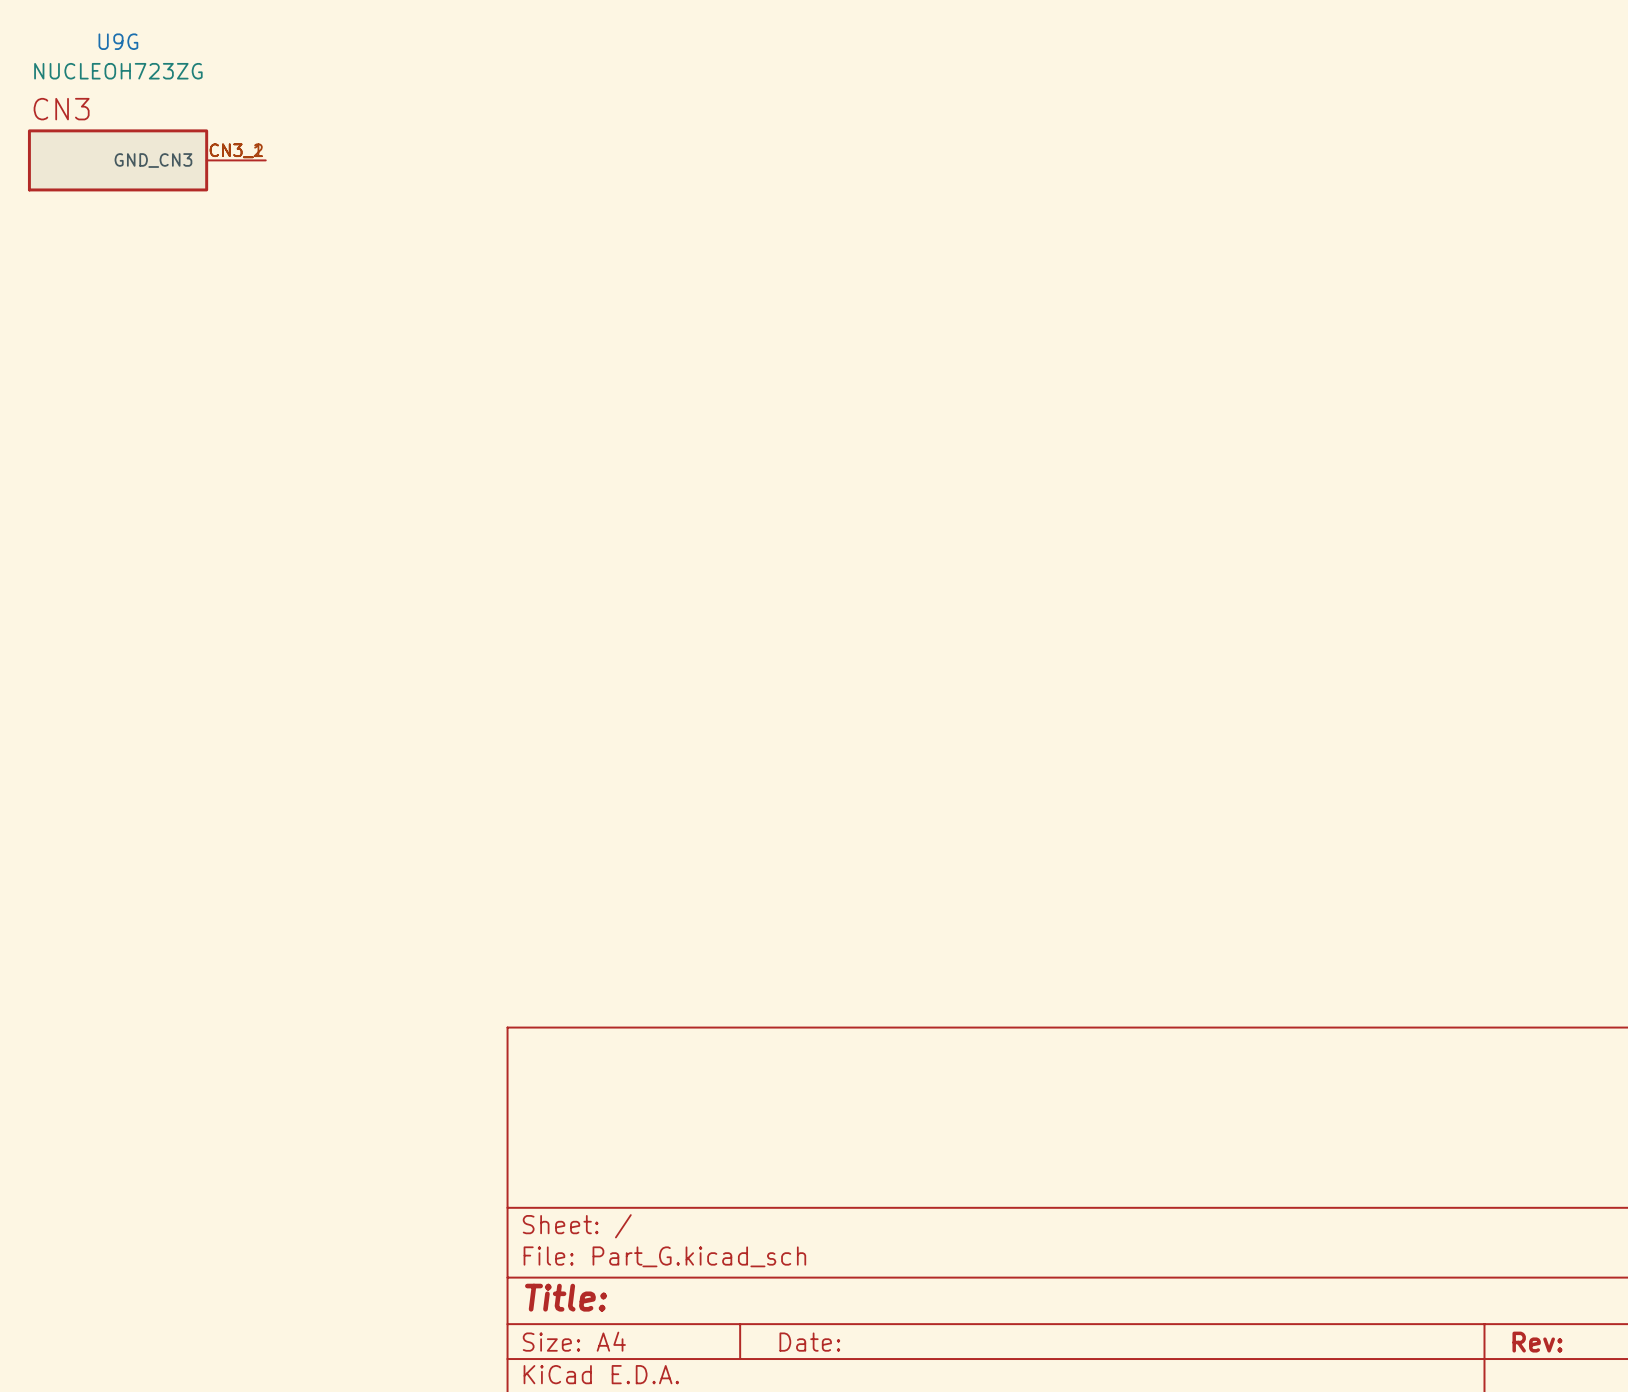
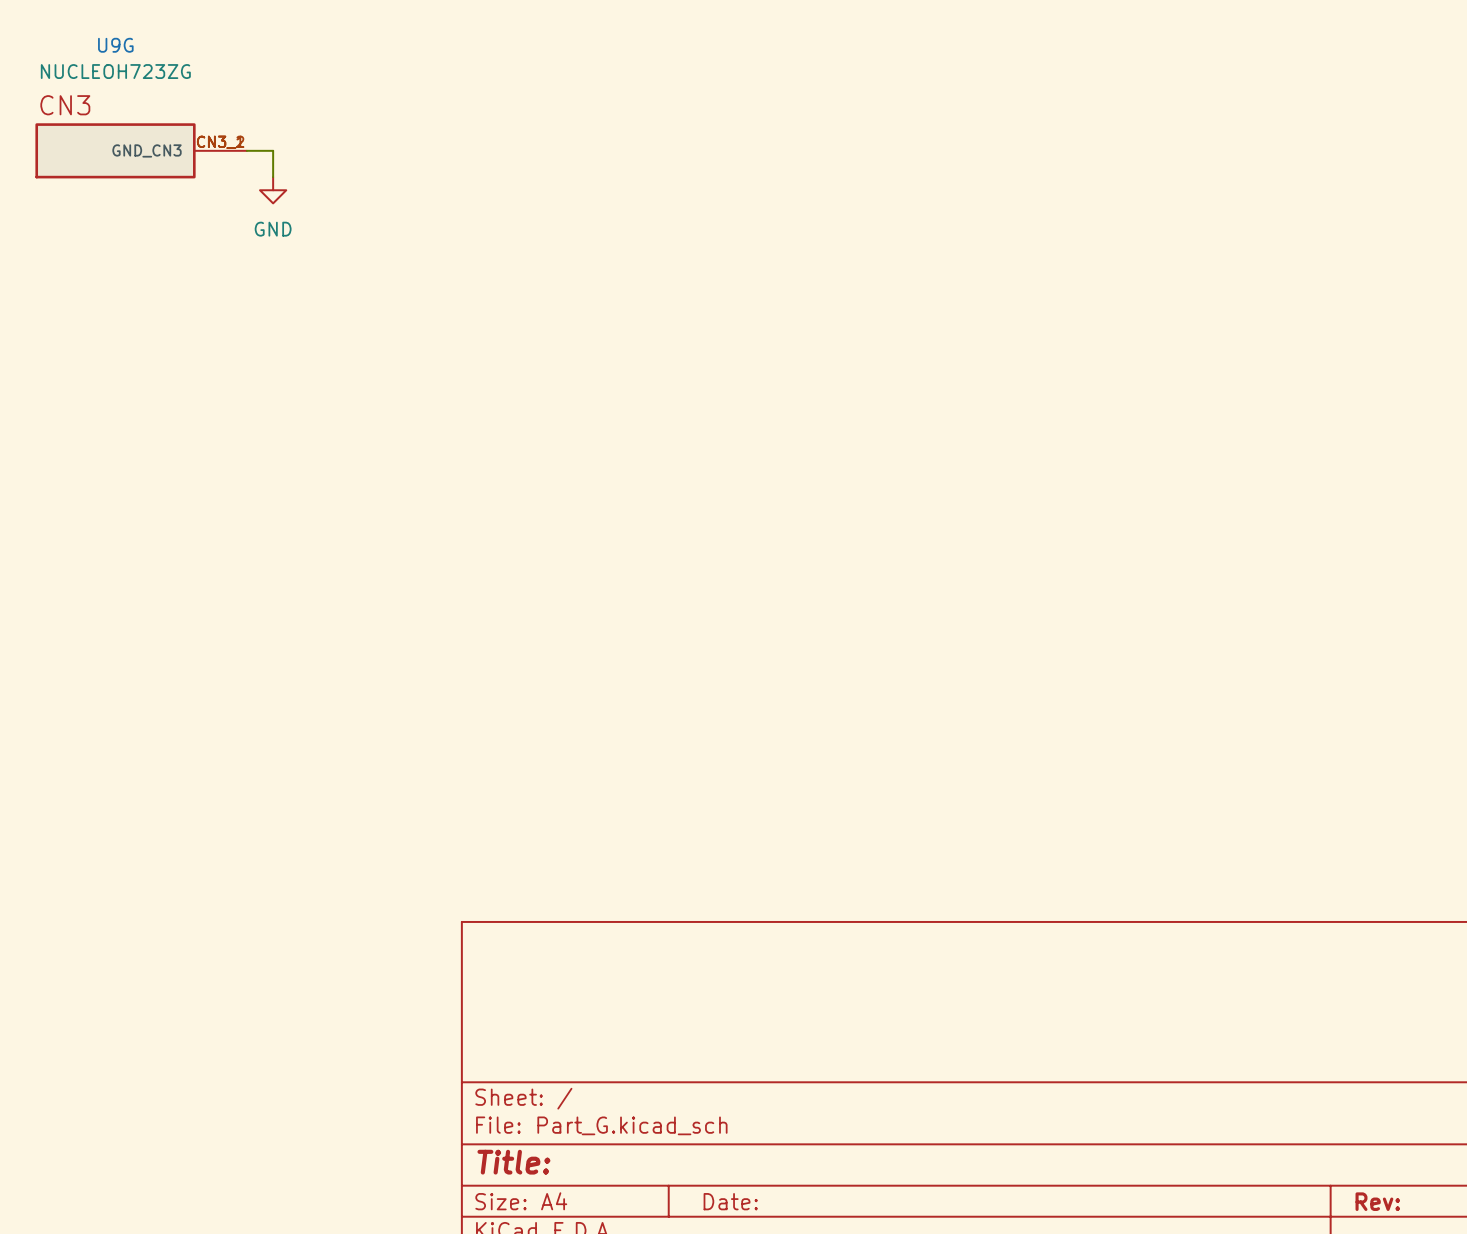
wire: none -> (246, 150) (273, 150) (273, 177)
power symbol: none -> GND (273, 190)

